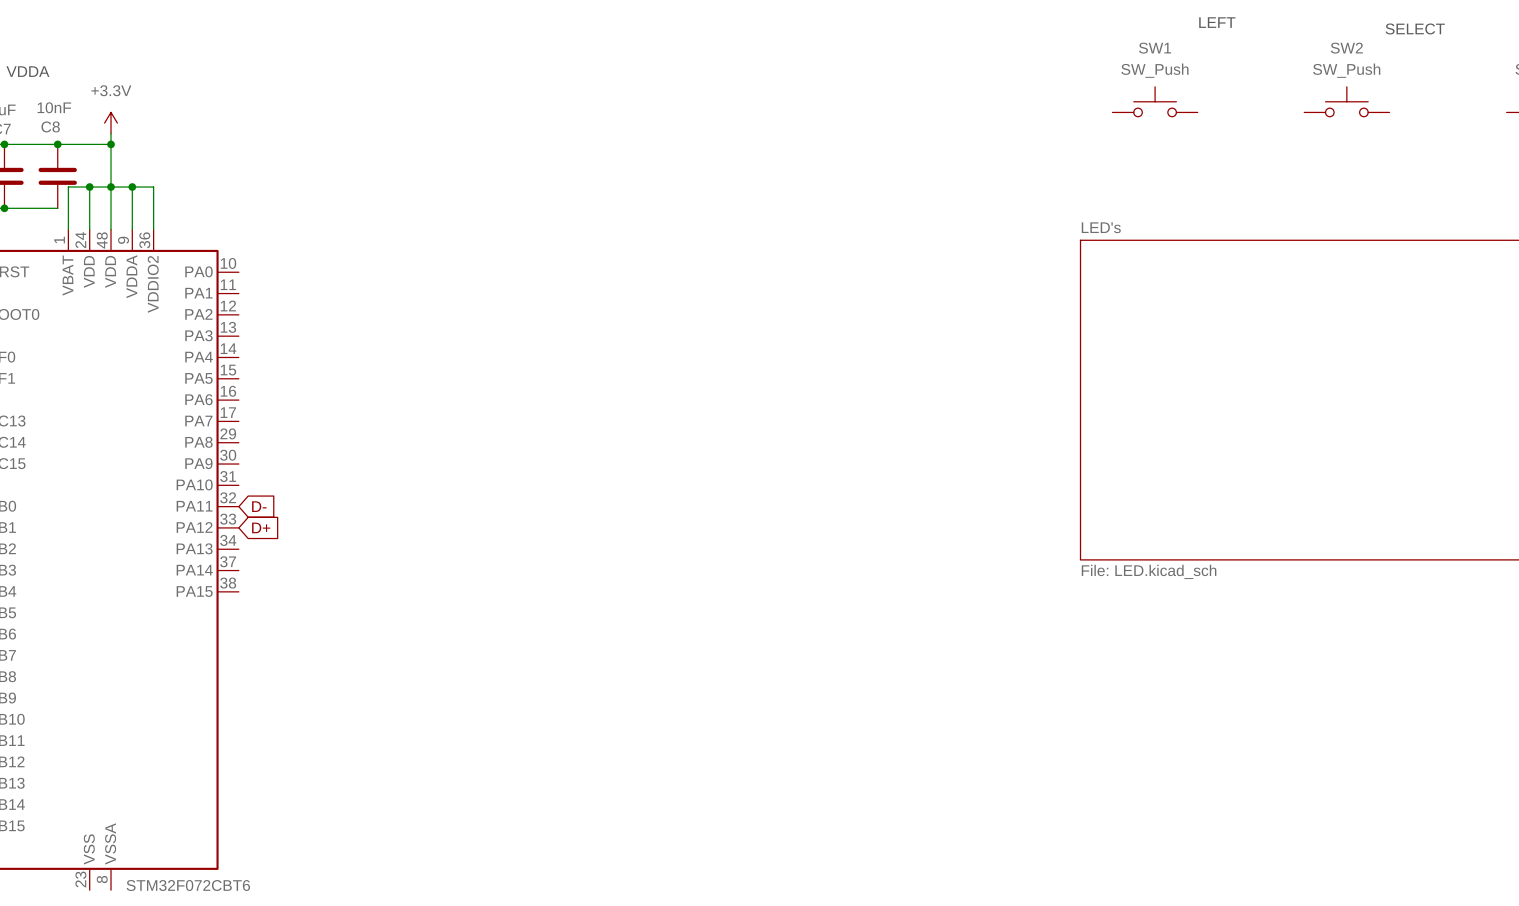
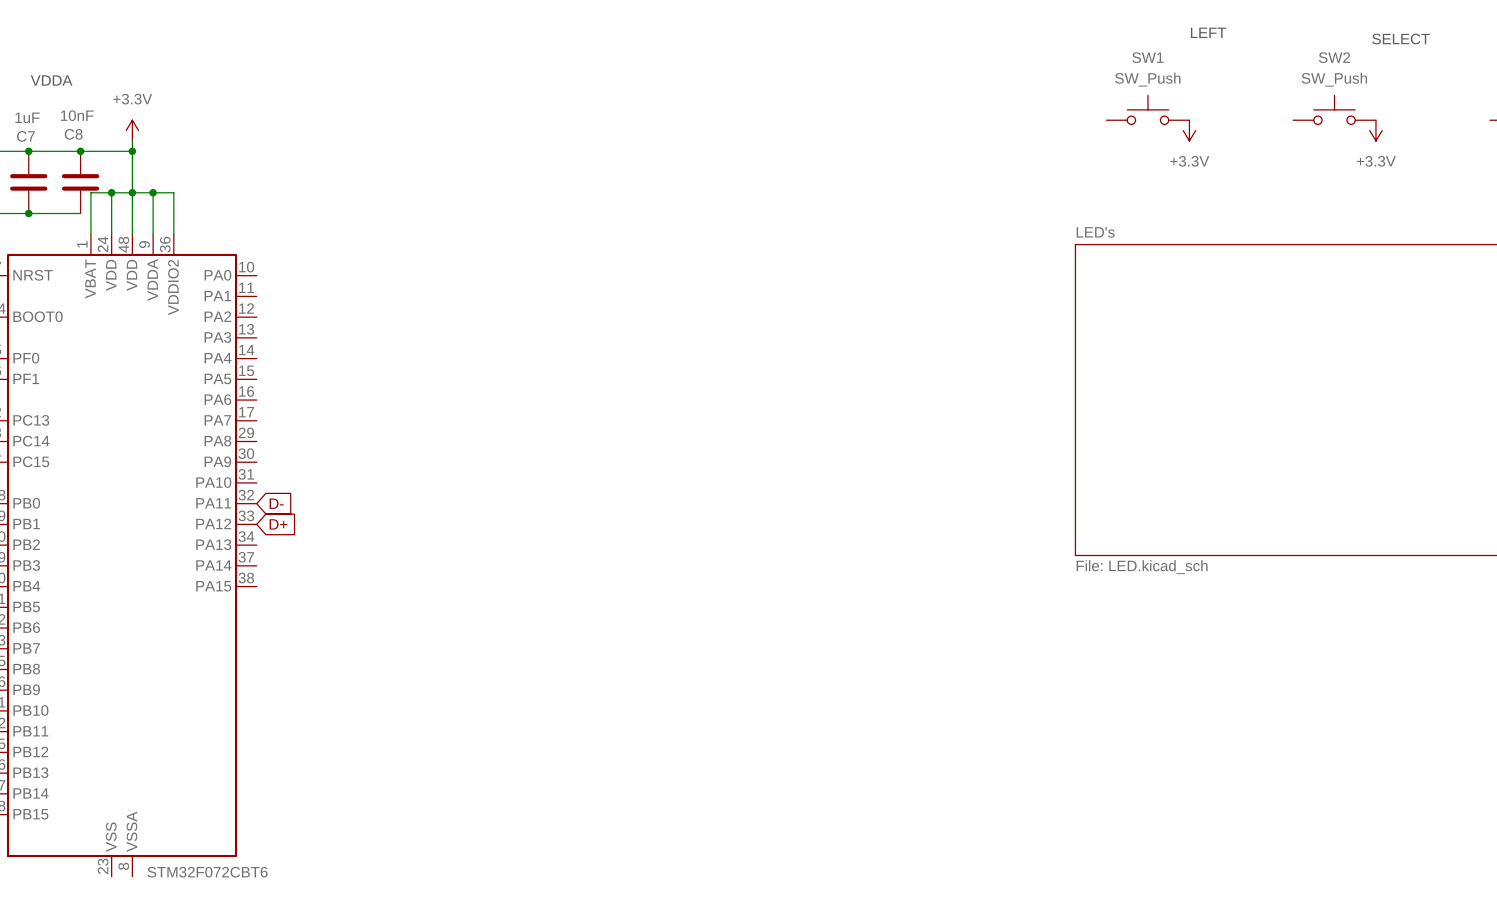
power symbol: none -> +3.3V (1189, 130)
power symbol: none -> +3.3V (1375, 130)

